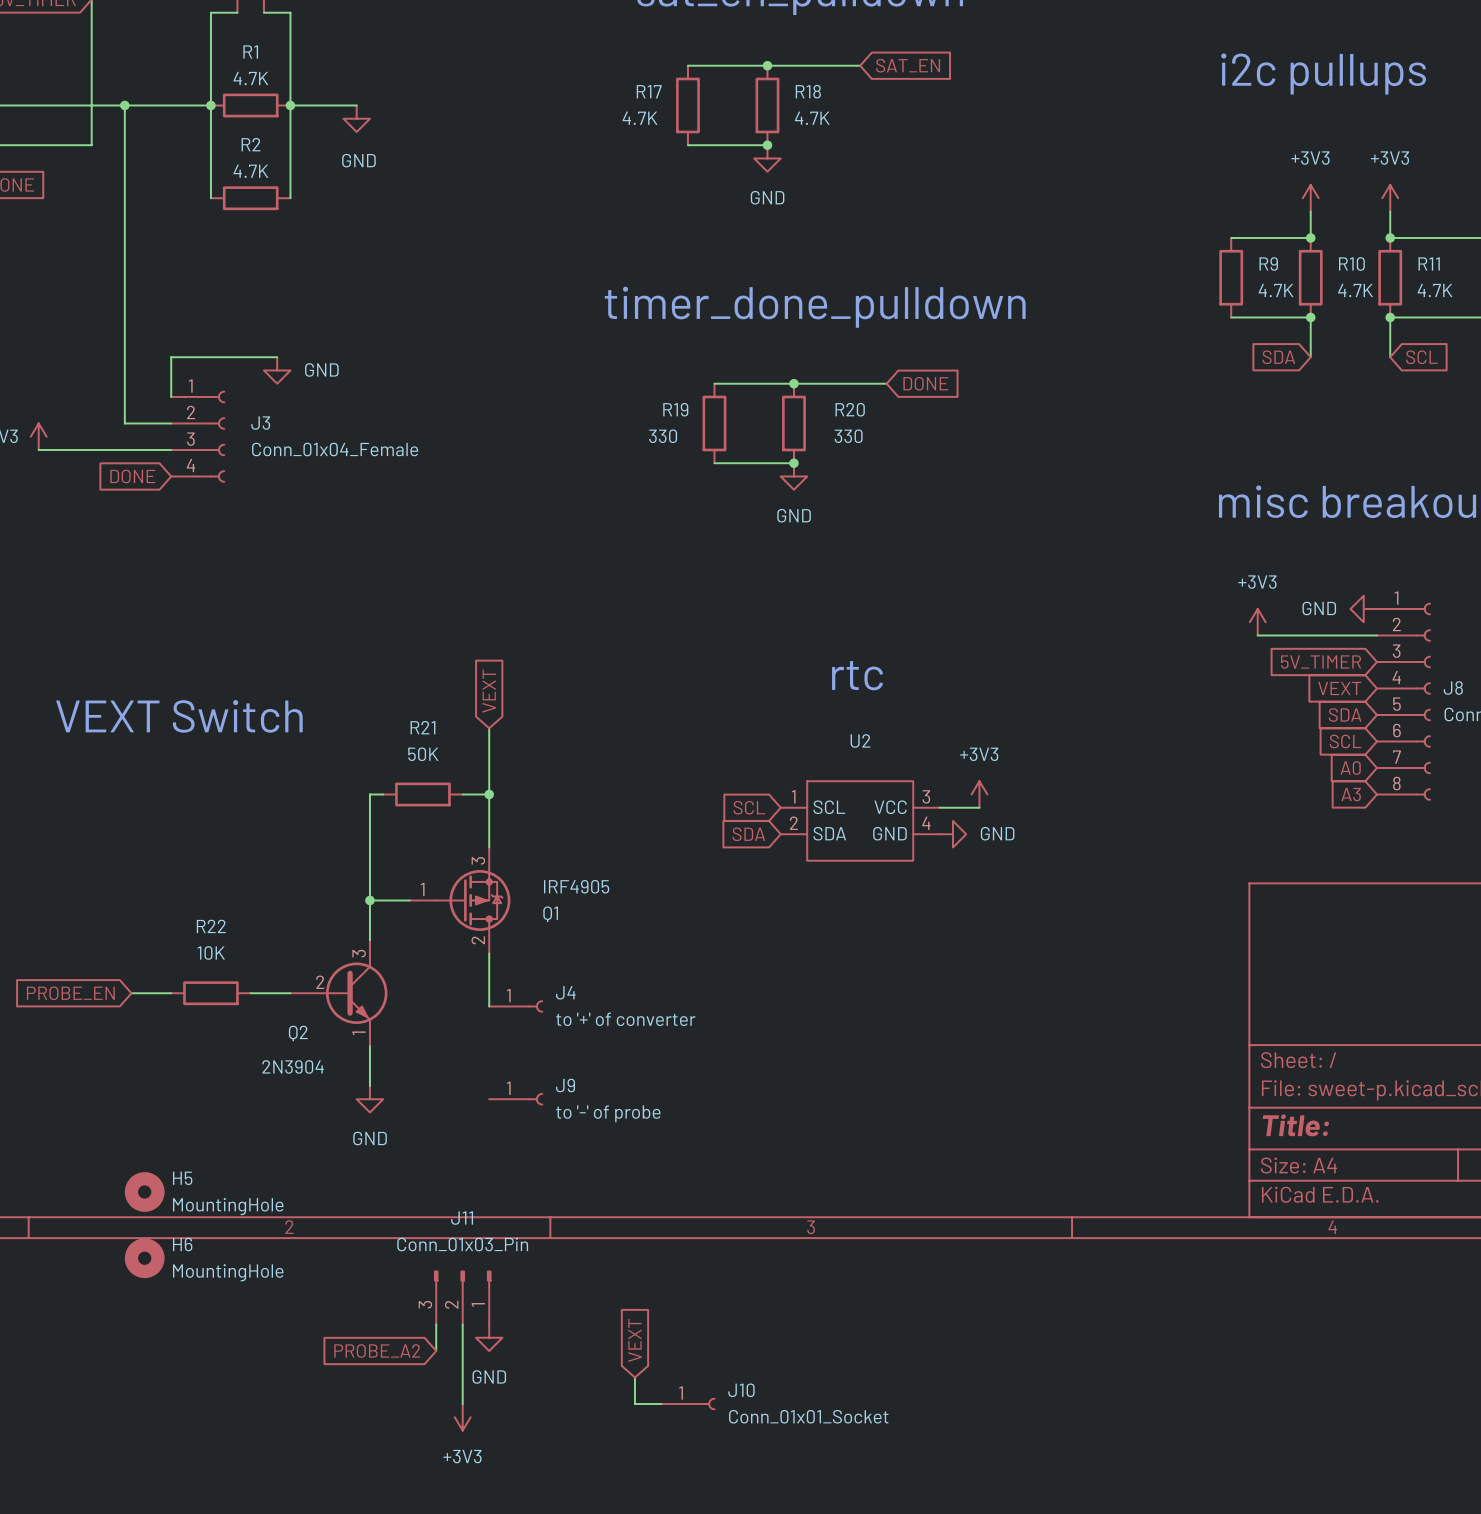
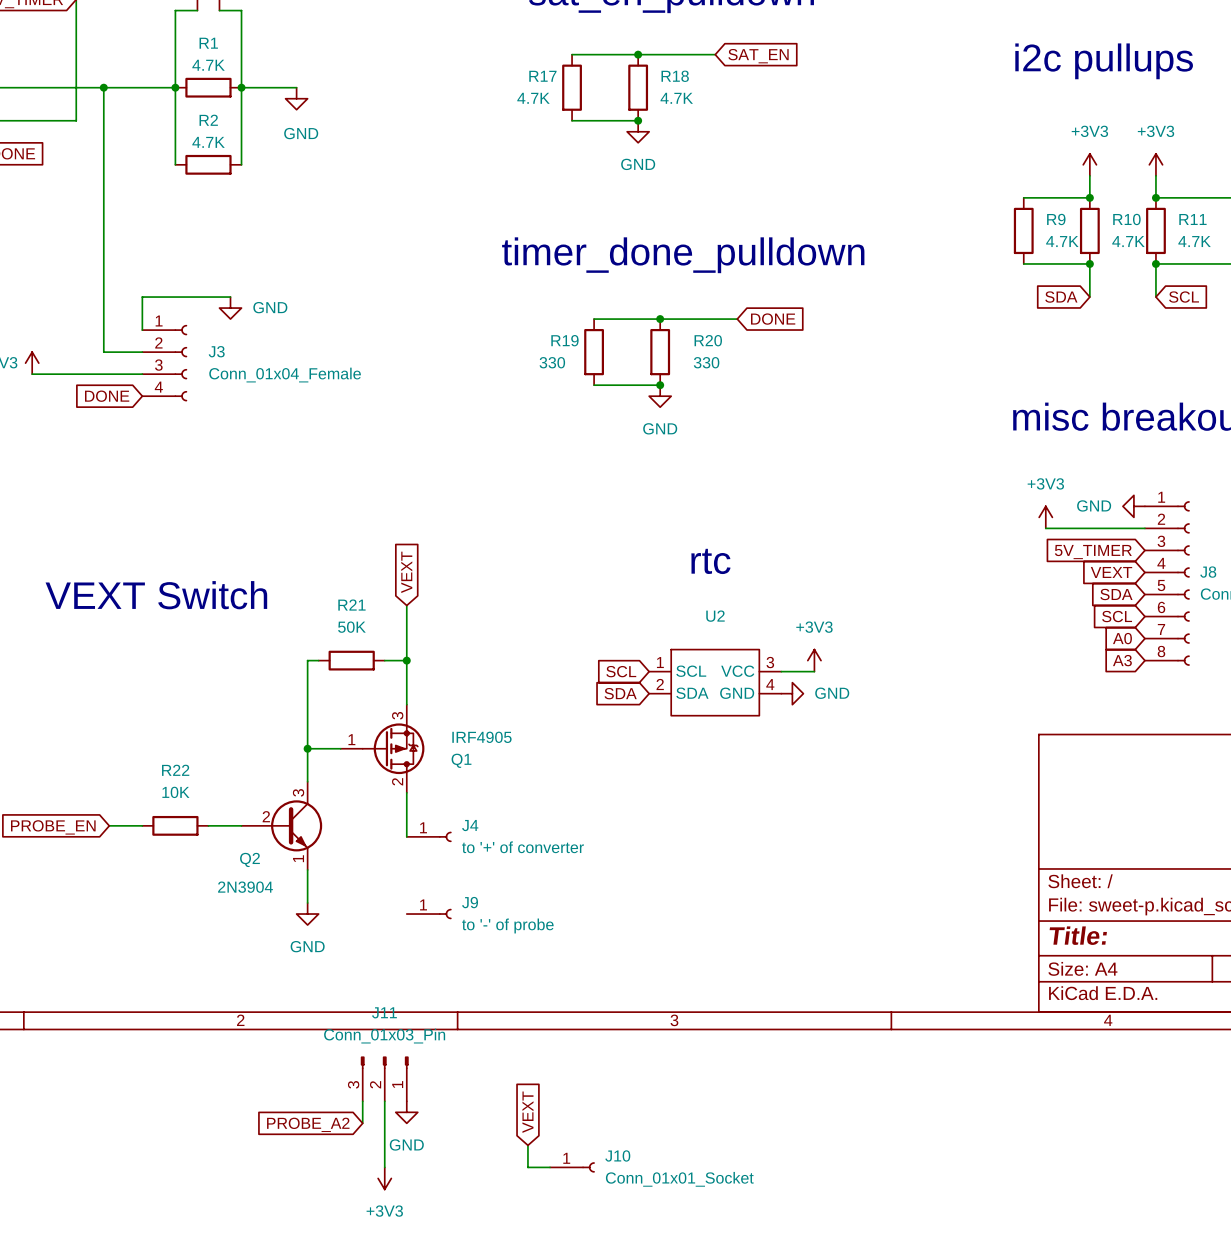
H5: MountingHole (144, 1191) -> none
H6: MountingHole (144, 1258) -> none

